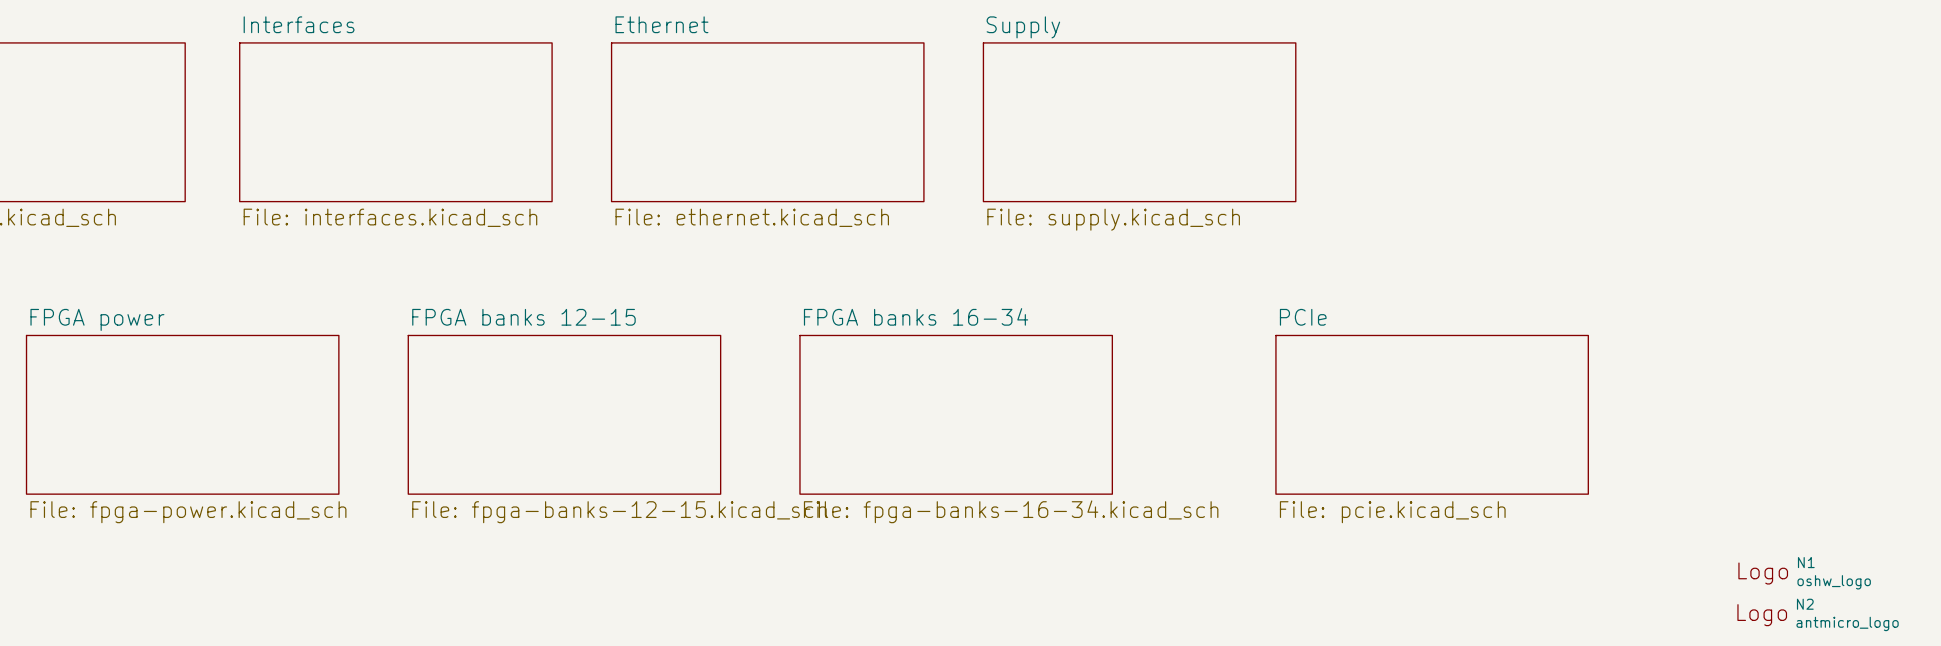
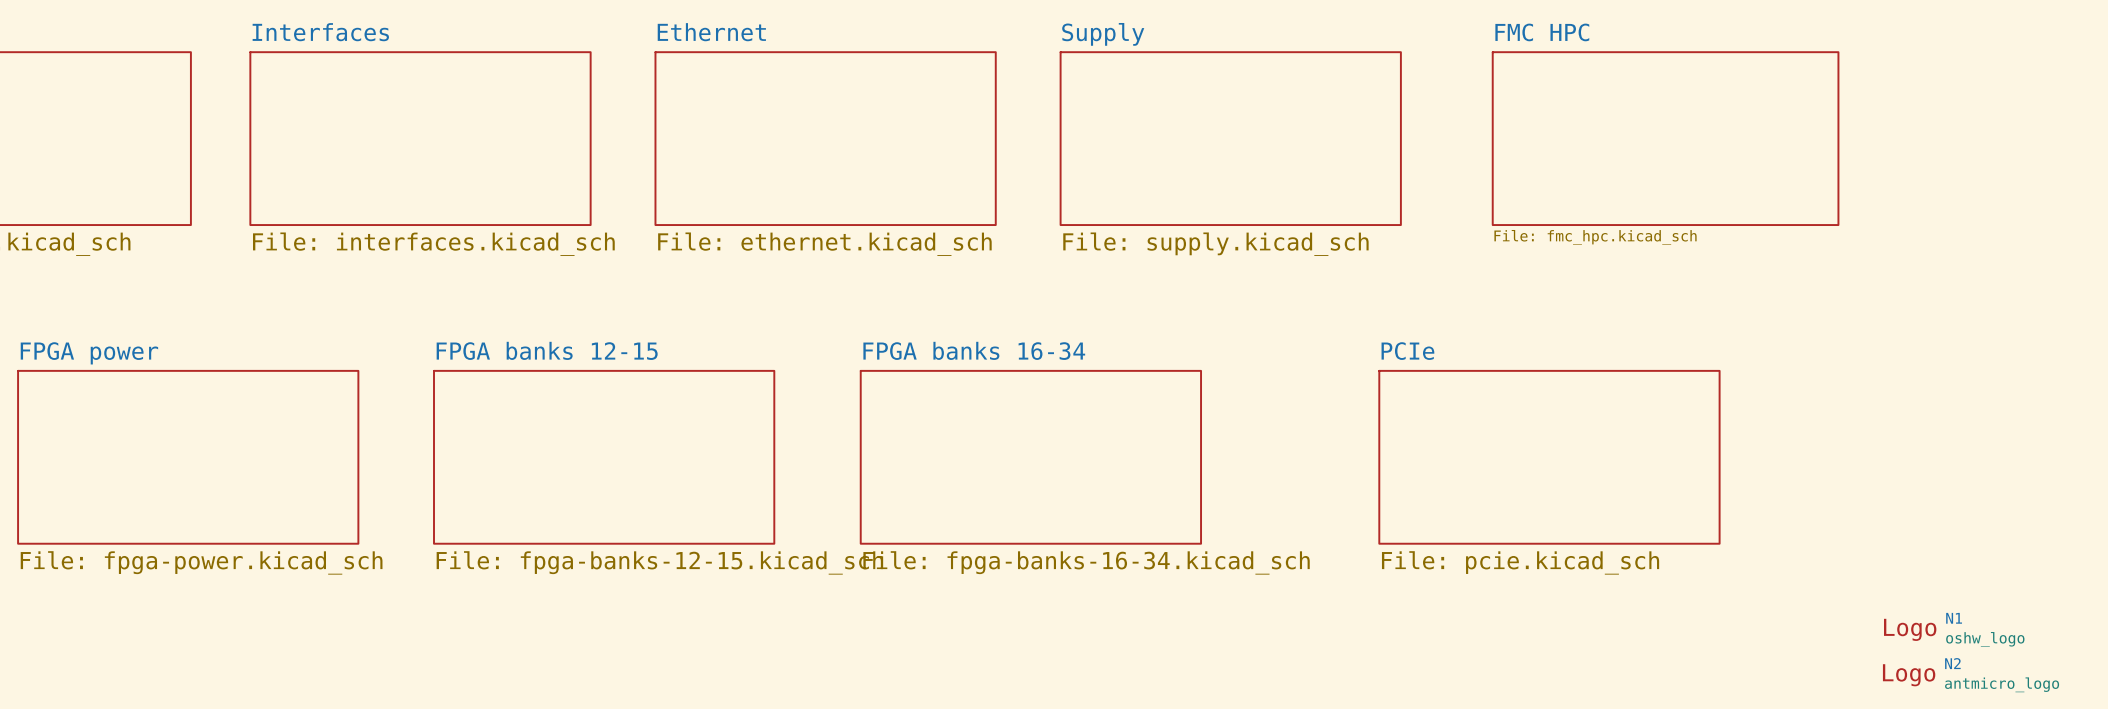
sheet FMC HPC: none -> File: fmc_hpc.kicad_sch (1665, 138)

